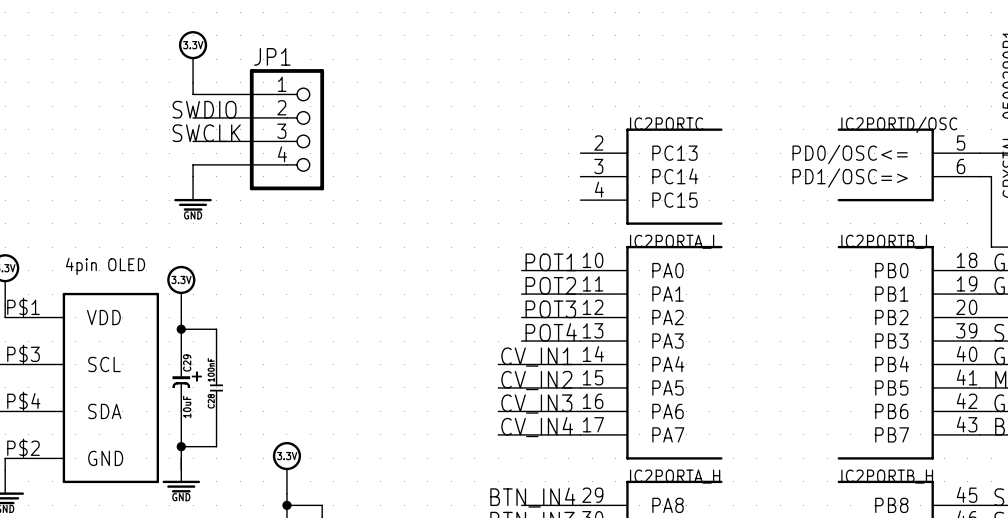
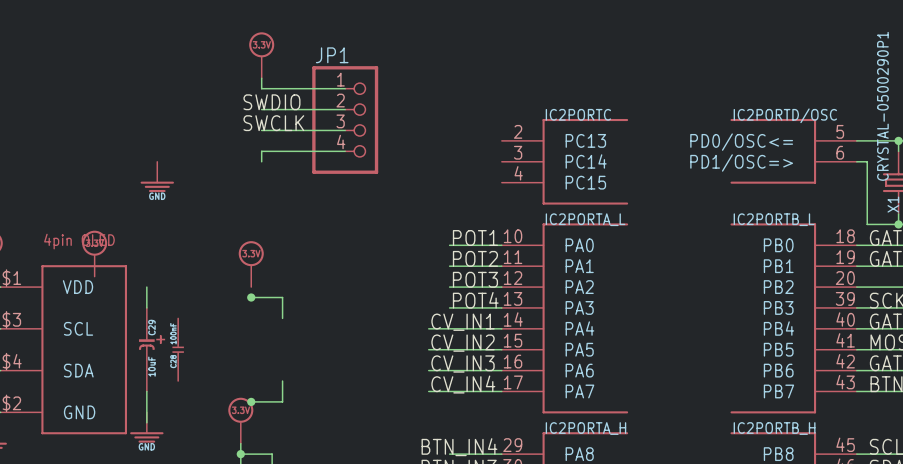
power symbol: (193, 56) -> none
power symbol: none -> (261, 55)
wire: (193, 82) (193, 94) (286, 94) -> (261, 78) (261, 88) (345, 88)
label position: SWDIO (204, 109) -> SWDIO (271, 102)
wire: (193, 117) (286, 117) -> (261, 109) (345, 109)
JP1 position: (286, 129) -> (345, 120)
label position: SWCLK (206, 133) -> SWCLK (273, 123)
wire: (193, 141) (286, 141) -> (261, 130) (345, 130)
wire: (286, 164) (193, 164) (193, 176) -> (345, 151) (261, 151) (261, 161)
power symbol: none -> (94, 253)
power symbol: (181, 291) -> none
power symbol: none -> (251, 264)
wire: (181, 329) (216, 329) (216, 352) -> (251, 297) (282, 297) (282, 318)
junction: (181, 329) -> none
junction: none -> (251, 297)
wire: (216, 423) (216, 446) (181, 446) -> (282, 381) (282, 401) (251, 401)
junction: (181, 446) -> none
junction: none -> (251, 401)

